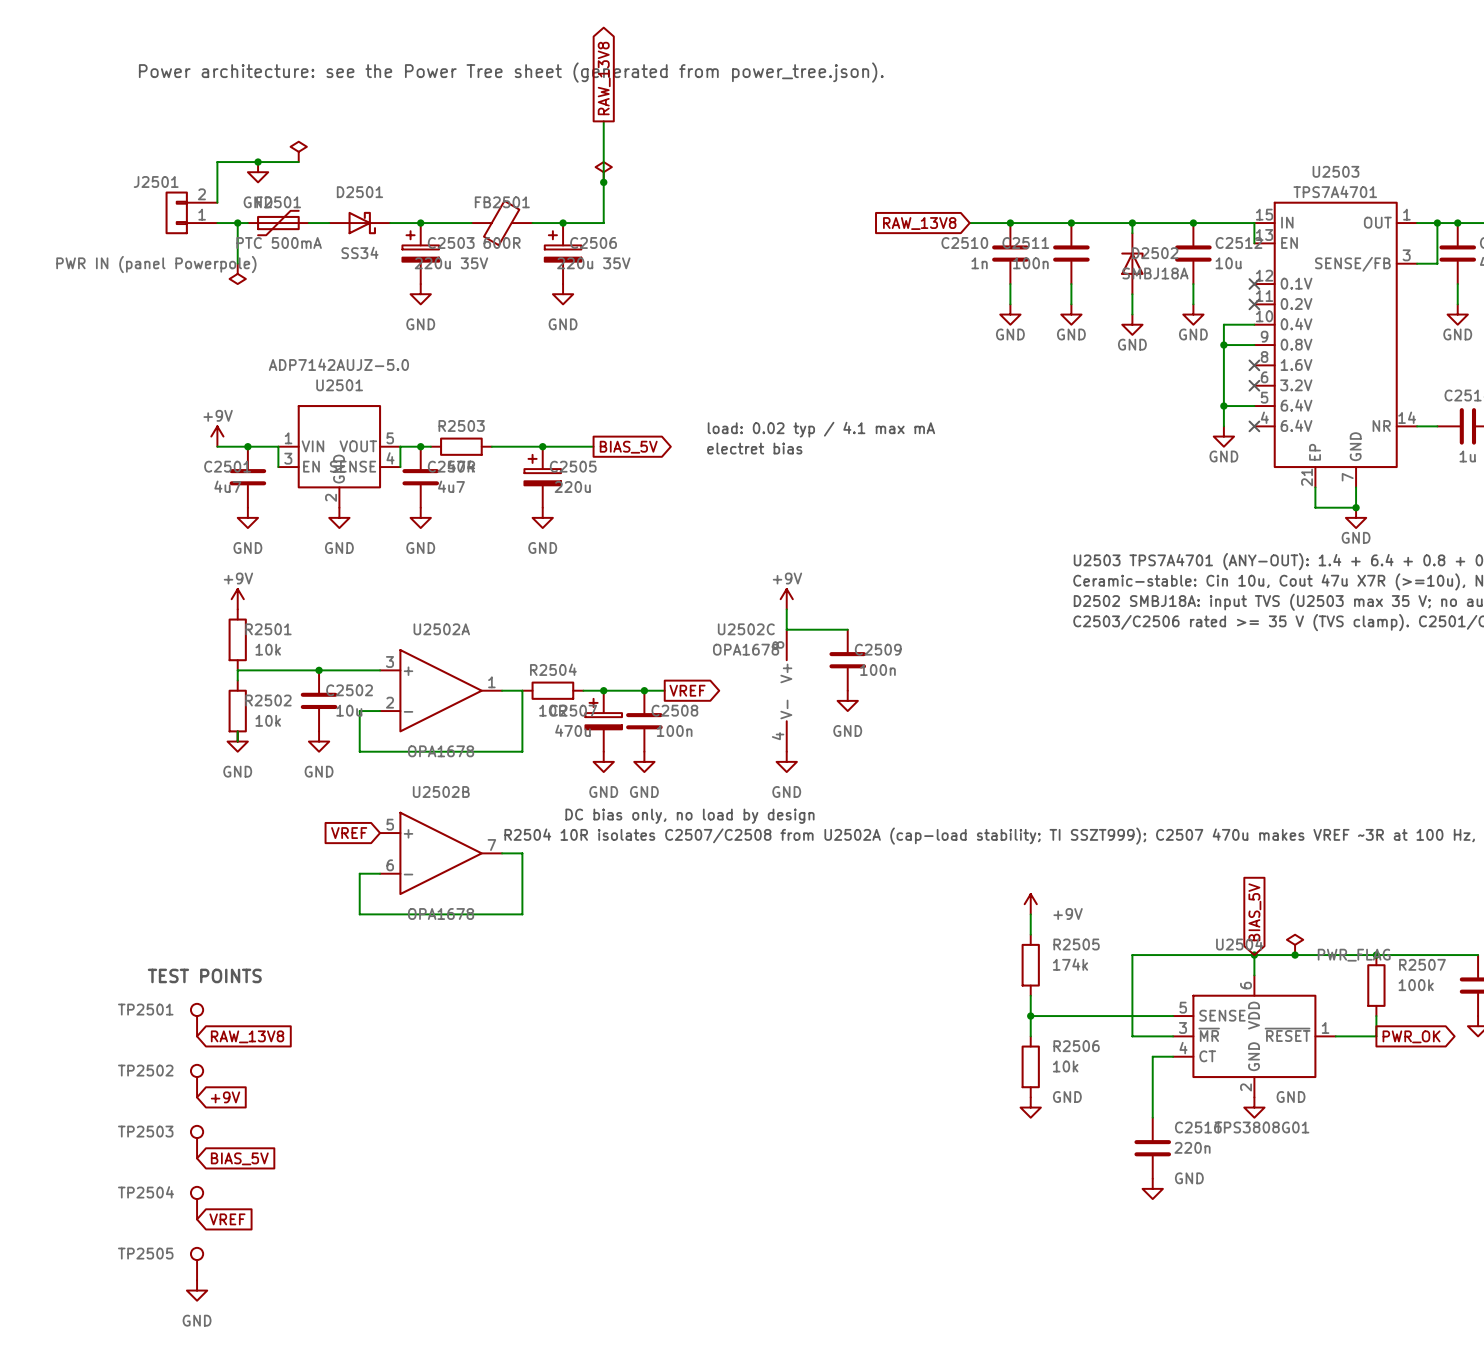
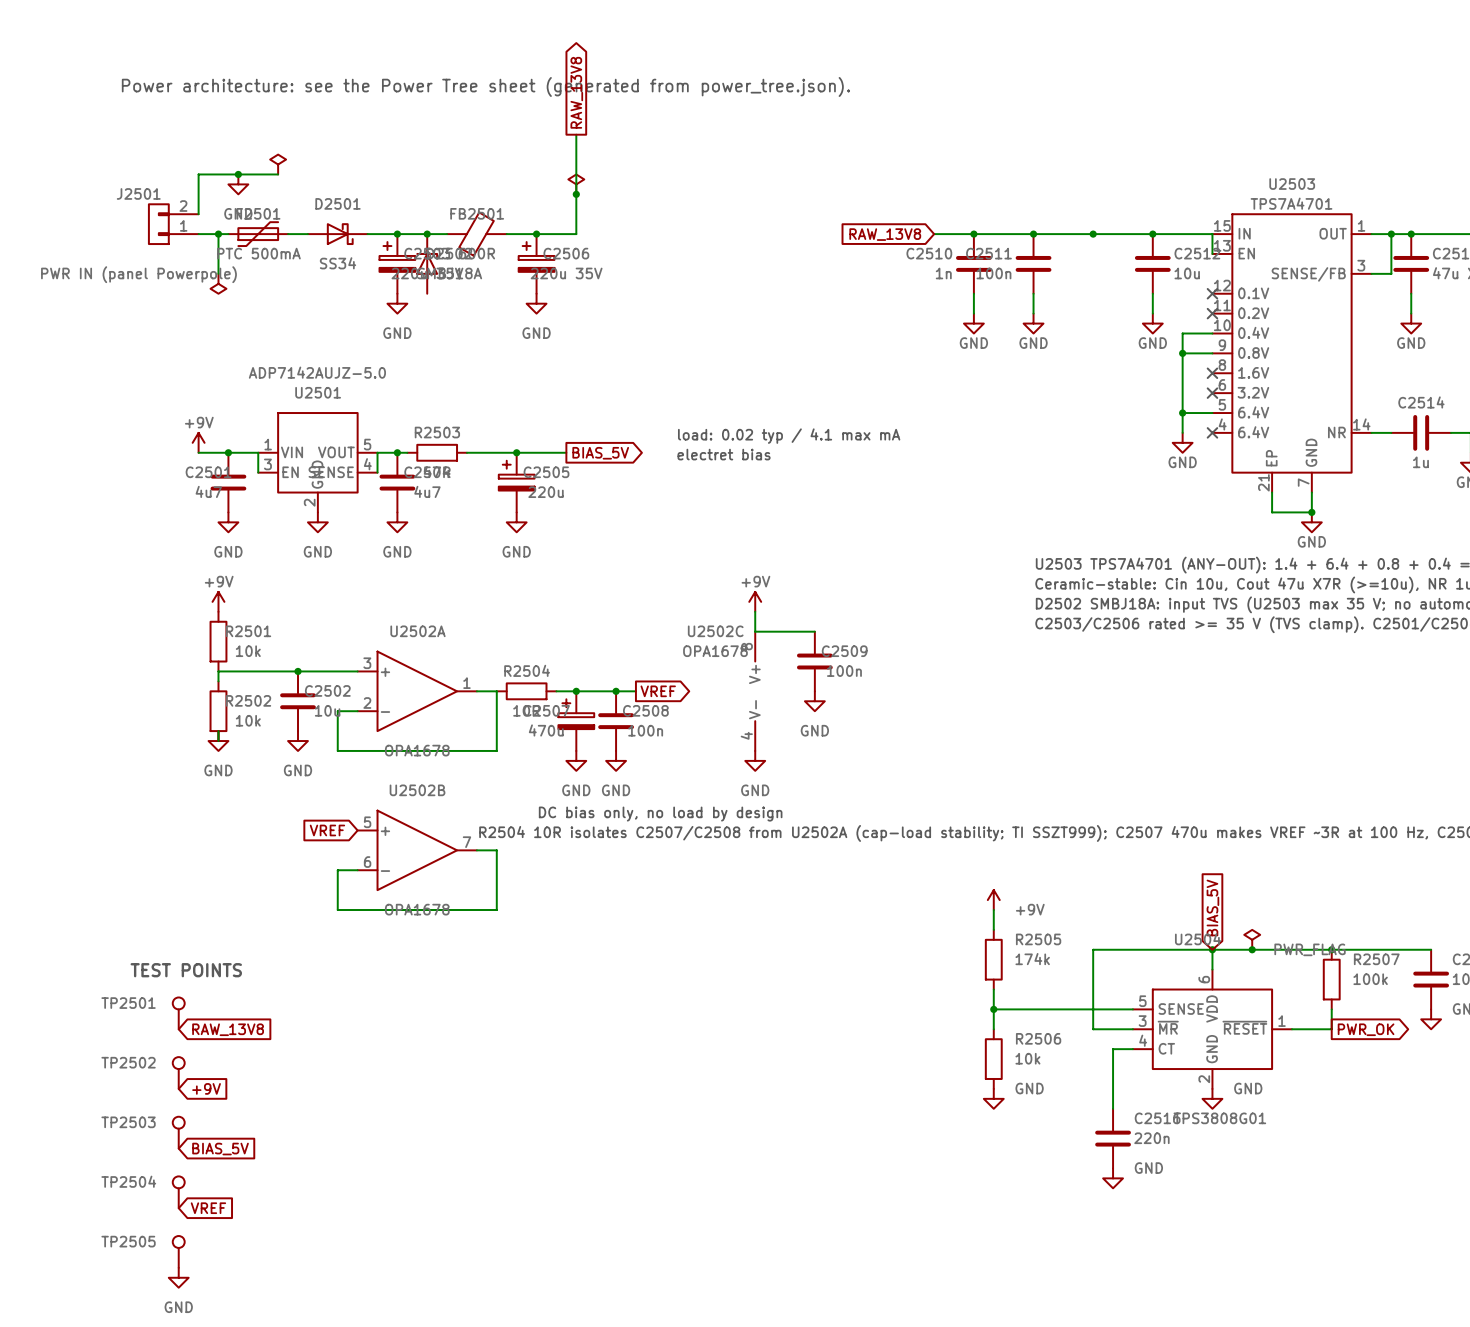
junction: none -> (427, 234)
wire: (1132, 223) (1132, 233) -> none
D2502 position: (1132, 263) -> (427, 263)
wire: (1132, 294) (1132, 314) -> none
power symbol: GND (1132, 324) -> none

